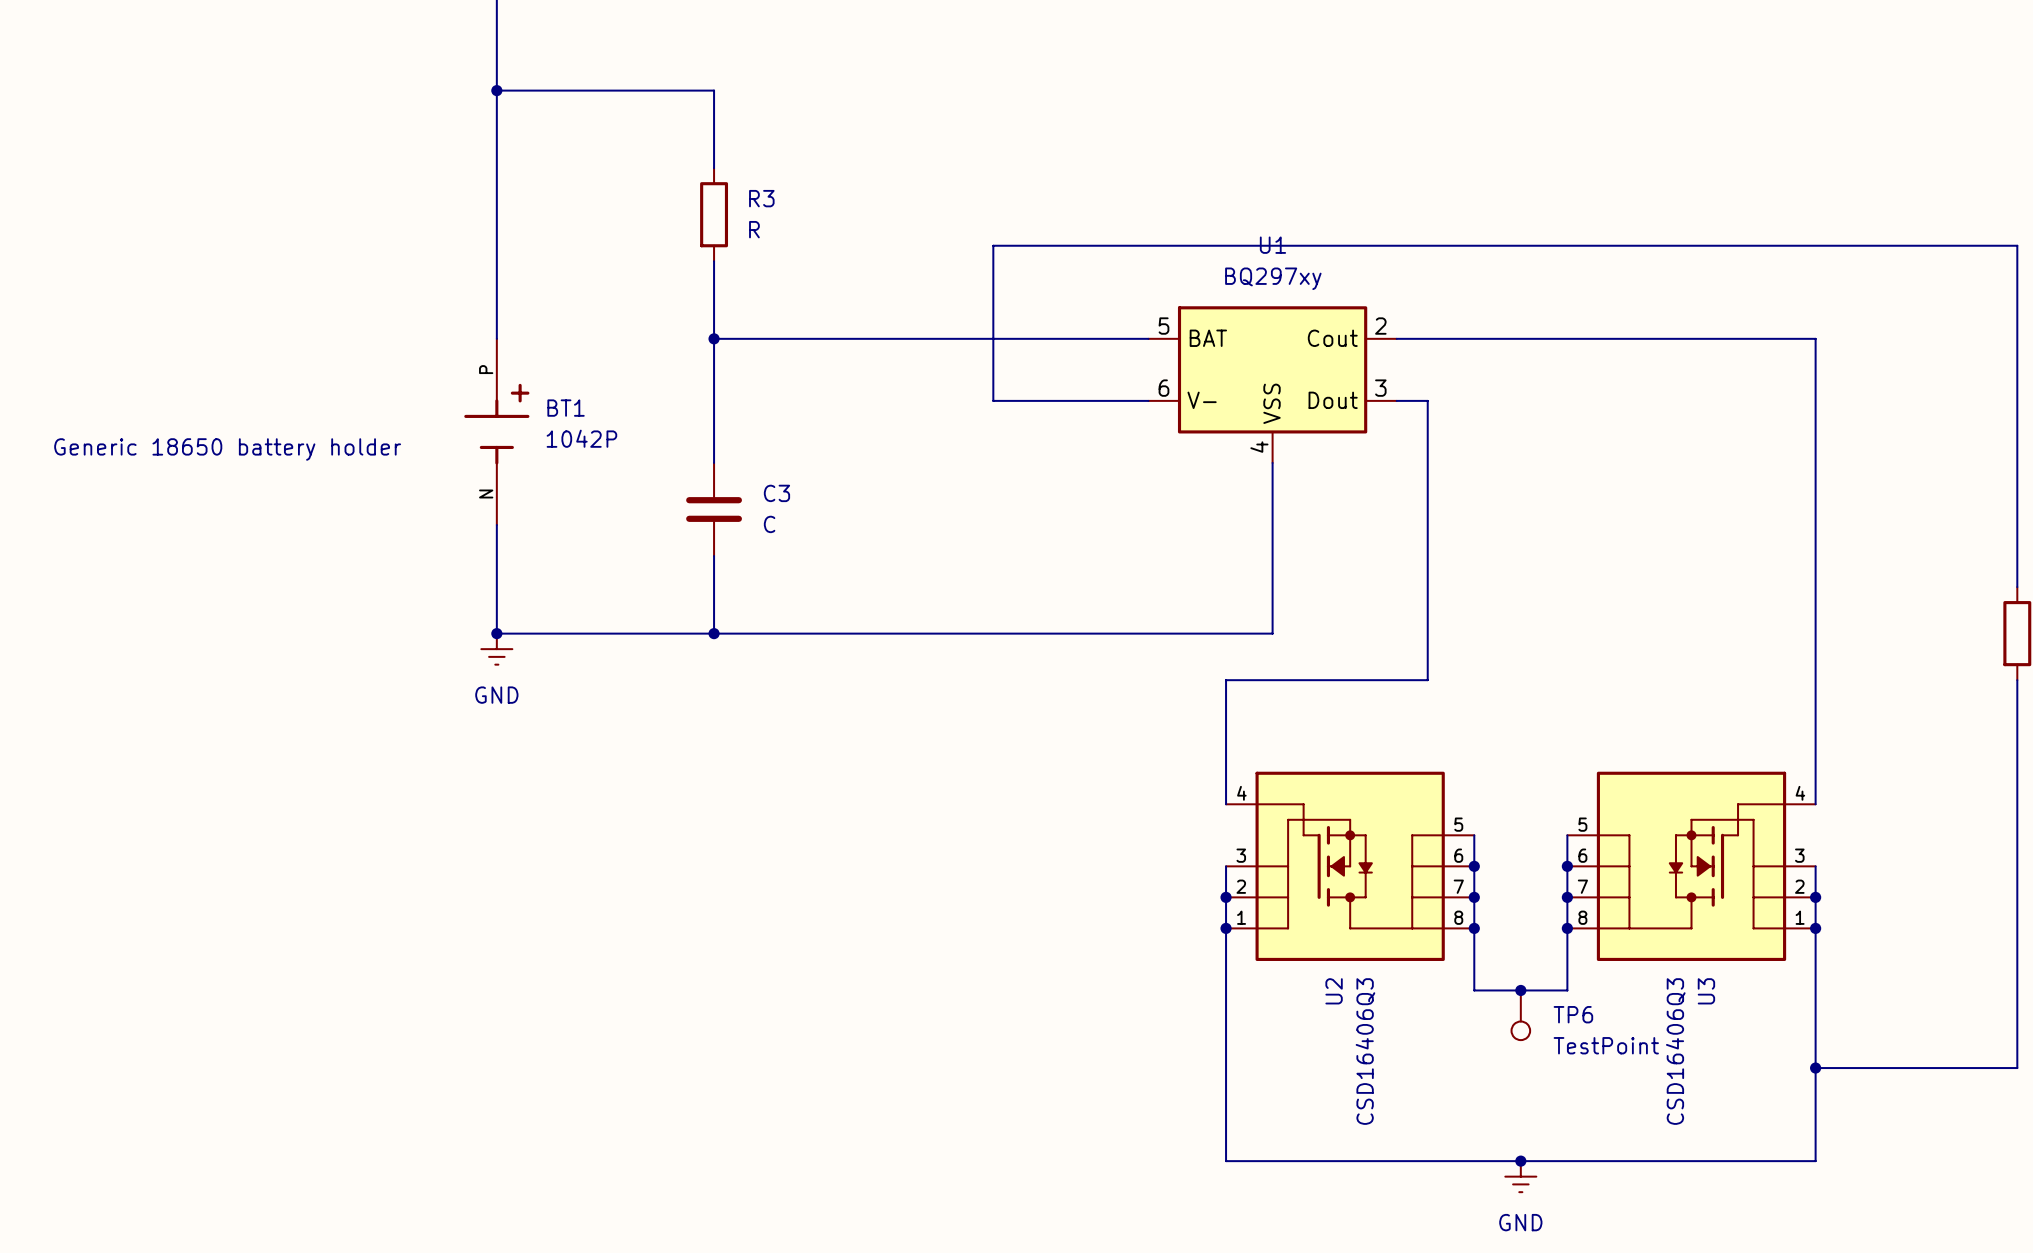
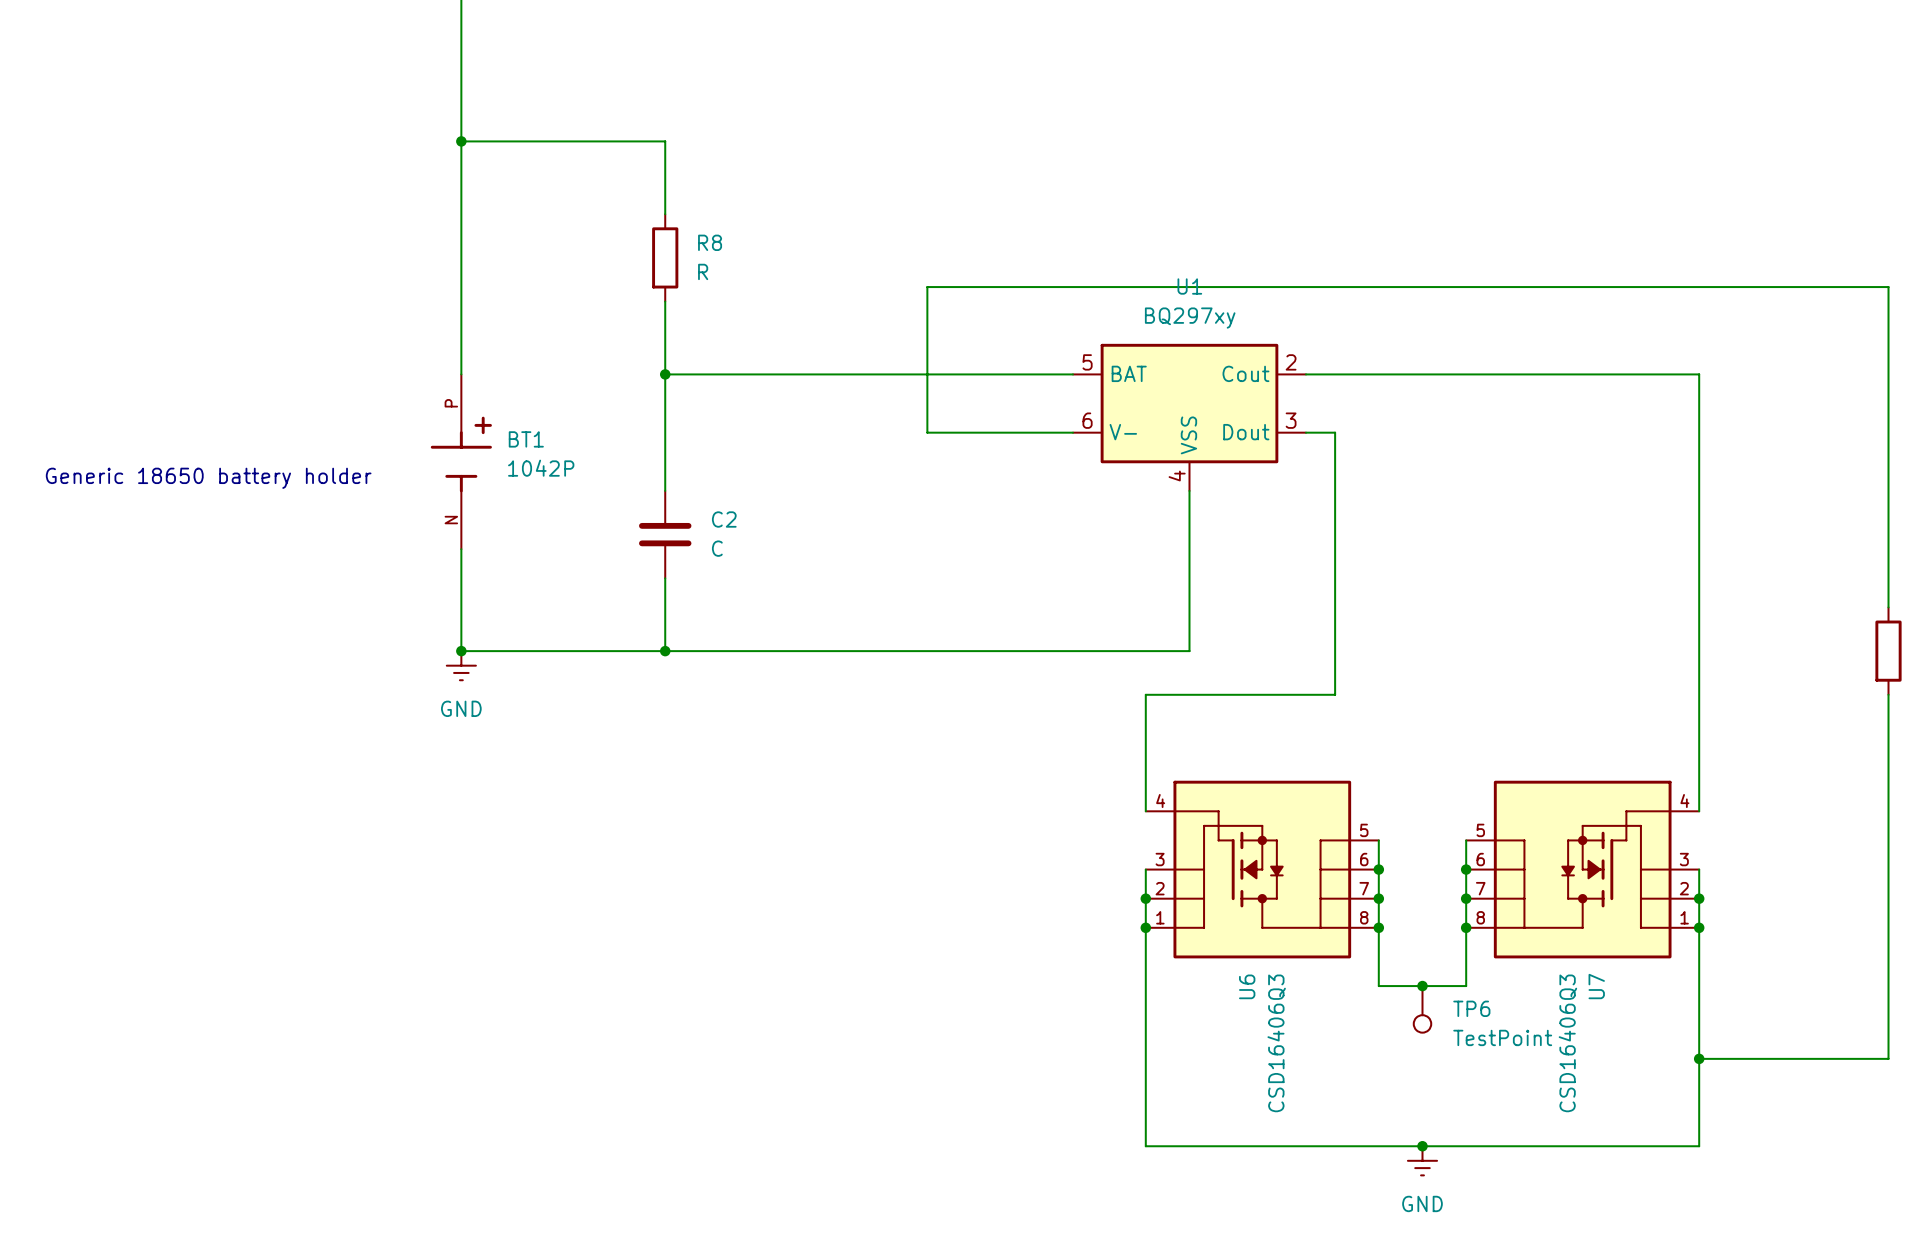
R3 name: R3 (761, 198) -> R8 (710, 242)
C3 name: C3 (776, 493) -> C2 (724, 519)
U2 name: U2 (1334, 991) -> U6 (1247, 986)
U3 name: U3 (1706, 991) -> U7 (1596, 986)

